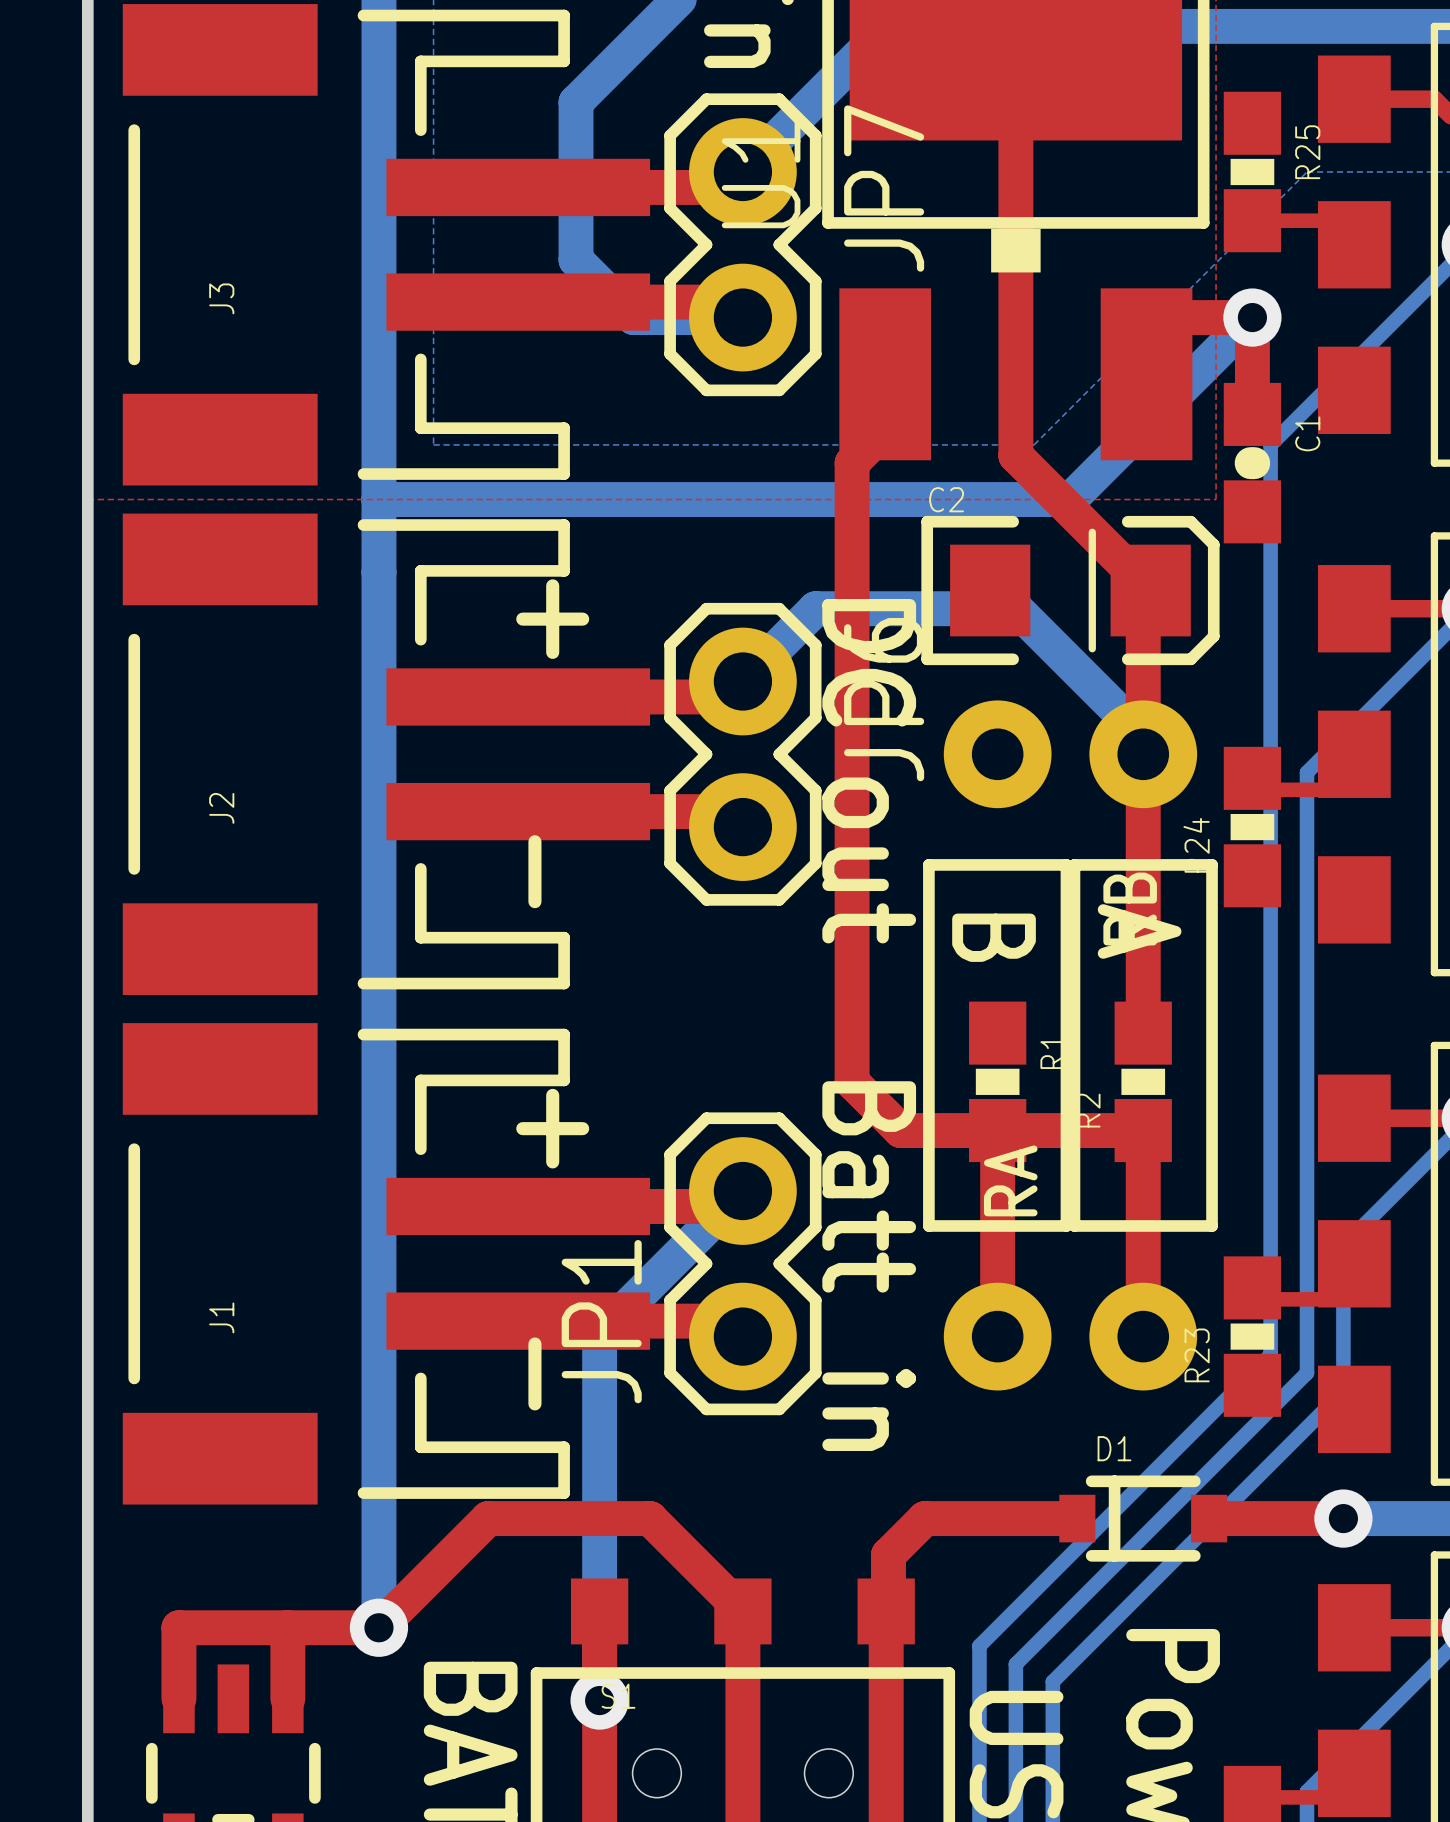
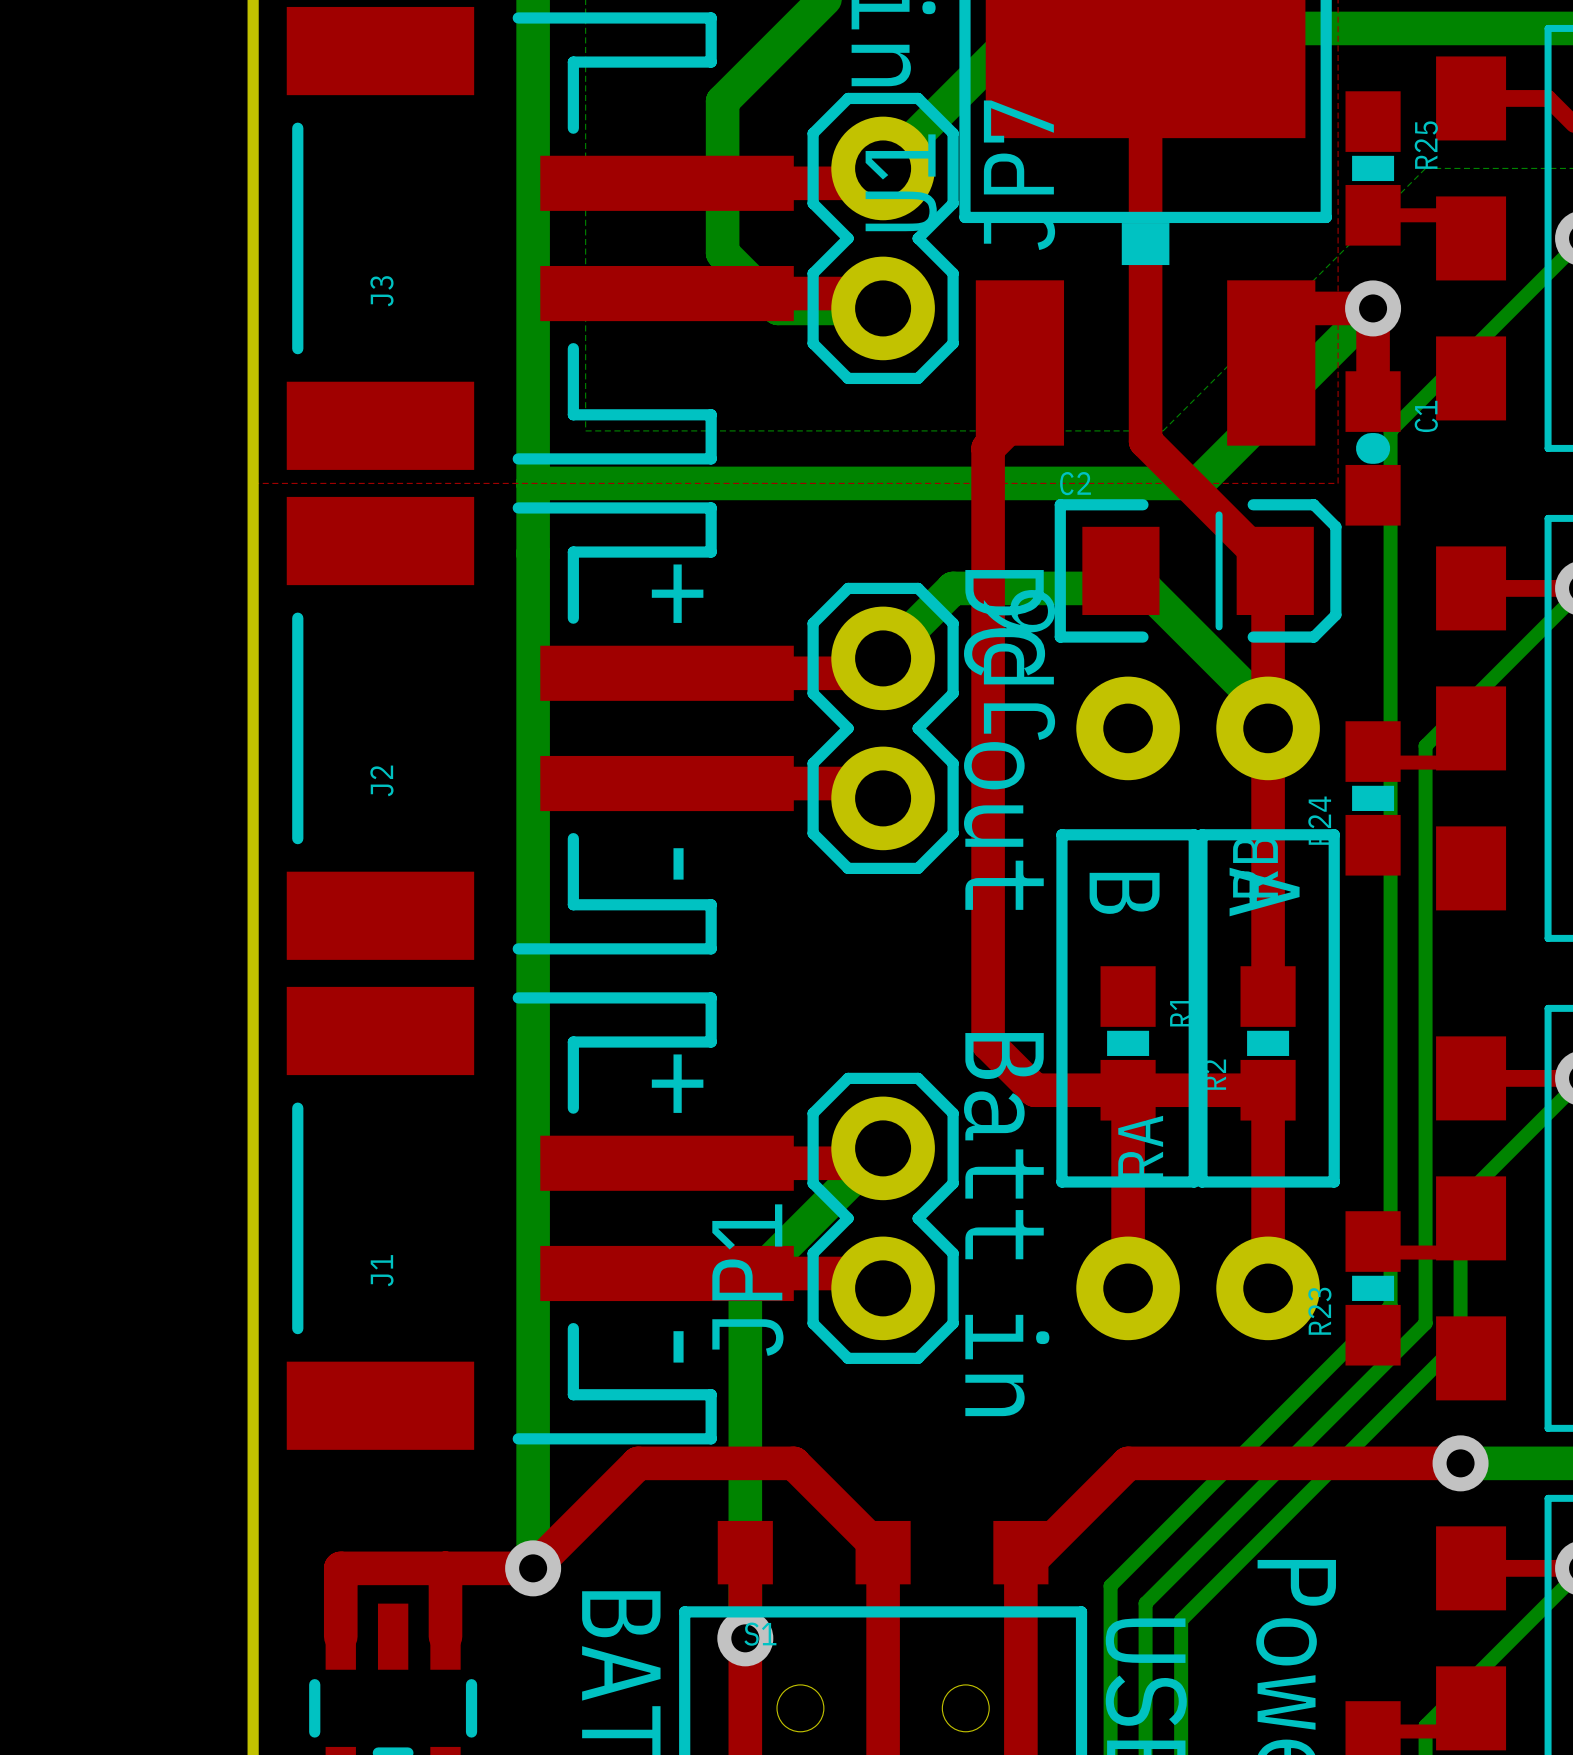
top track: (997, 1518) (924, 1518) (888, 1554) (888, 1609) (886, 1611) -> (1128, 1463) (1023, 1568) (1020, 1568)
top track: none -> (1204, 1463) (1331, 1463)
D1: (1143, 1518) -> none

